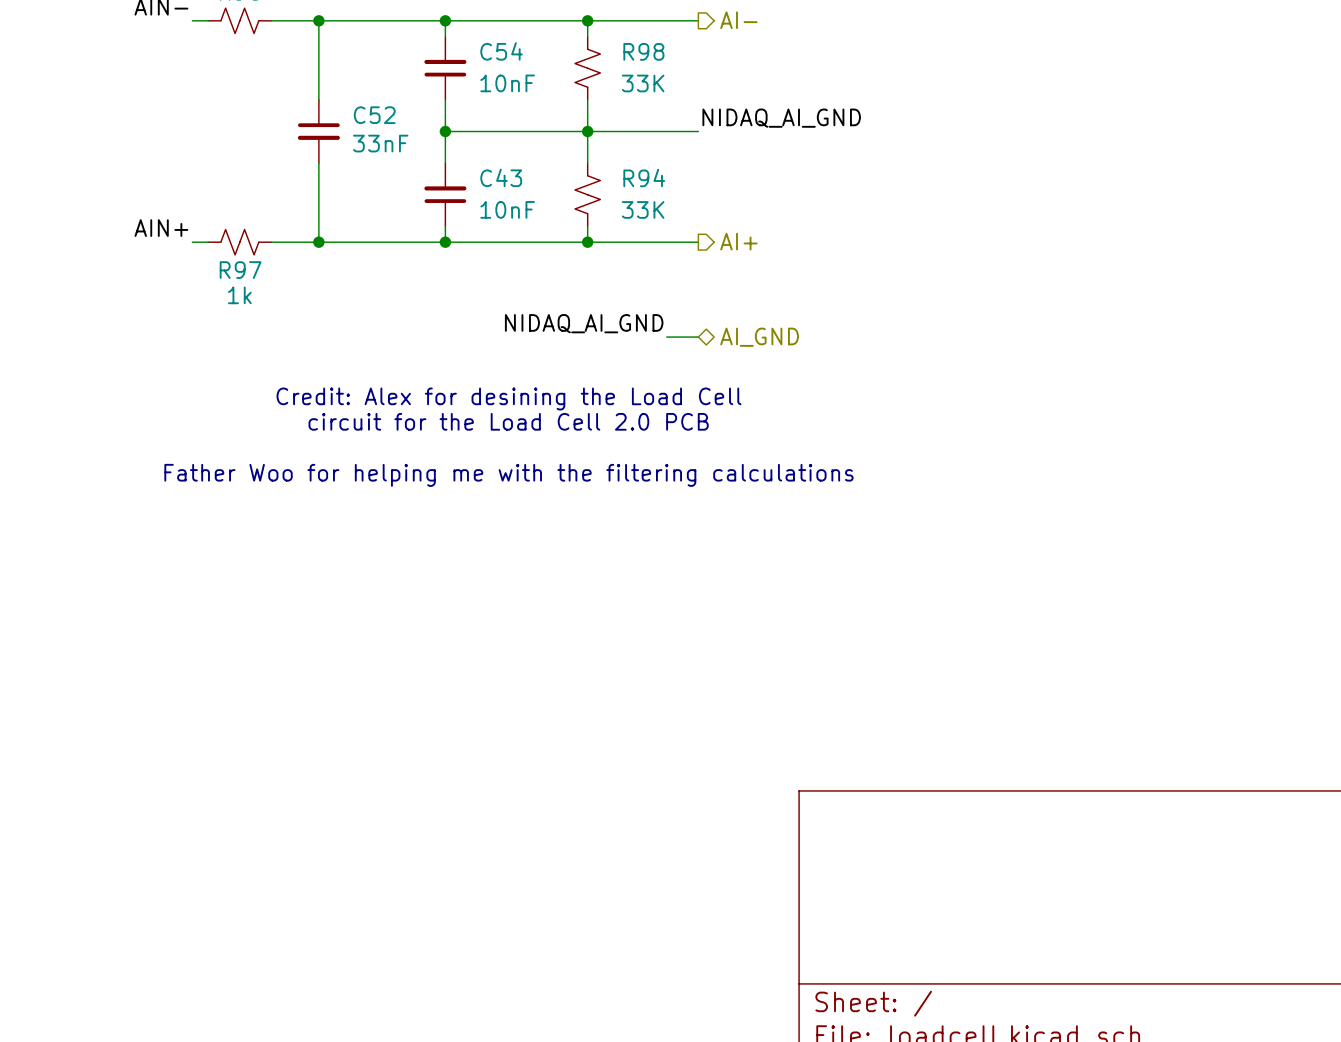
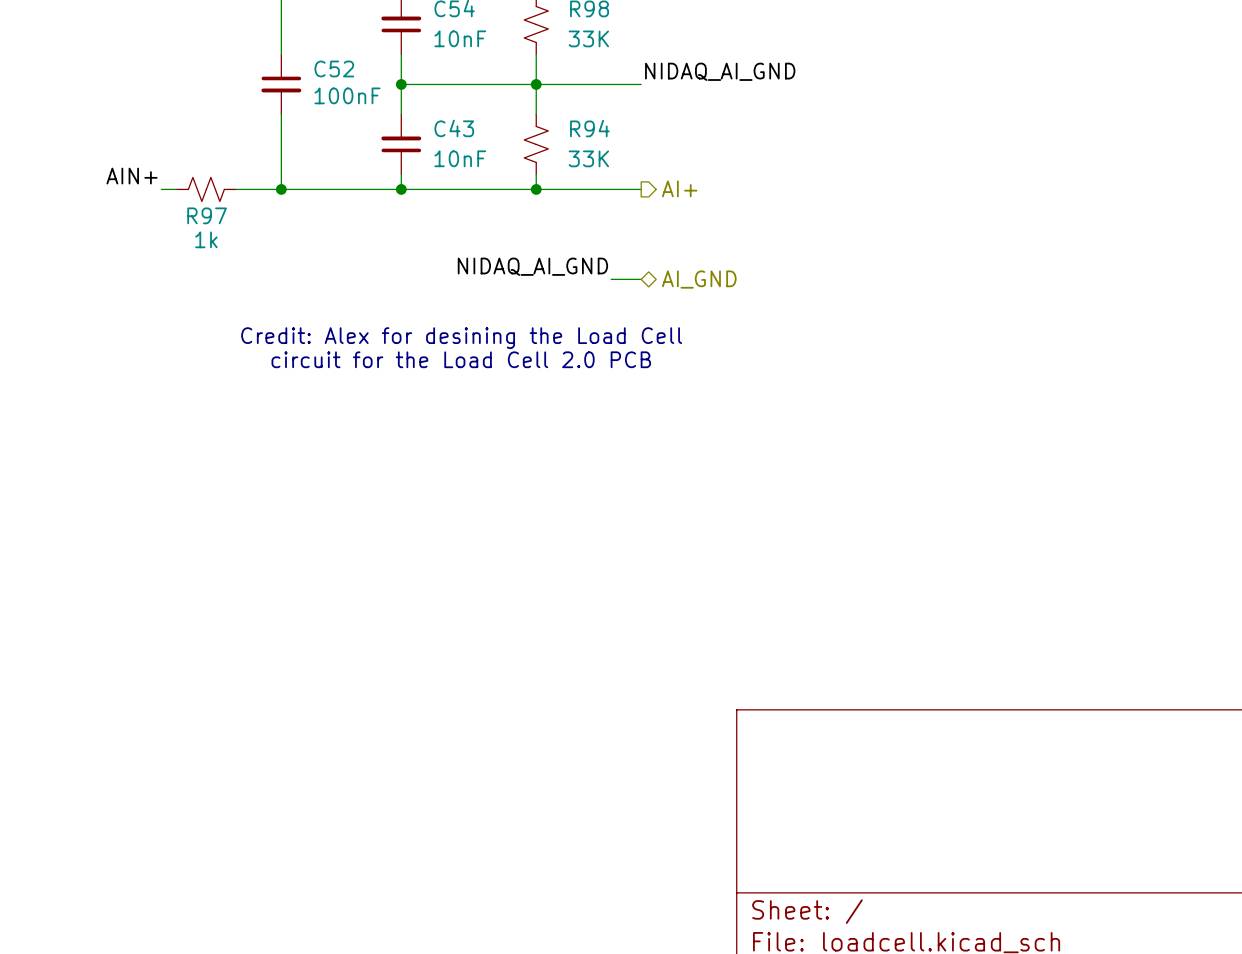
C52 value: 33nF (380, 143) -> 100nF (347, 95)
text: Father Woo for helping me with the filtering calculations (509, 475) -> none

